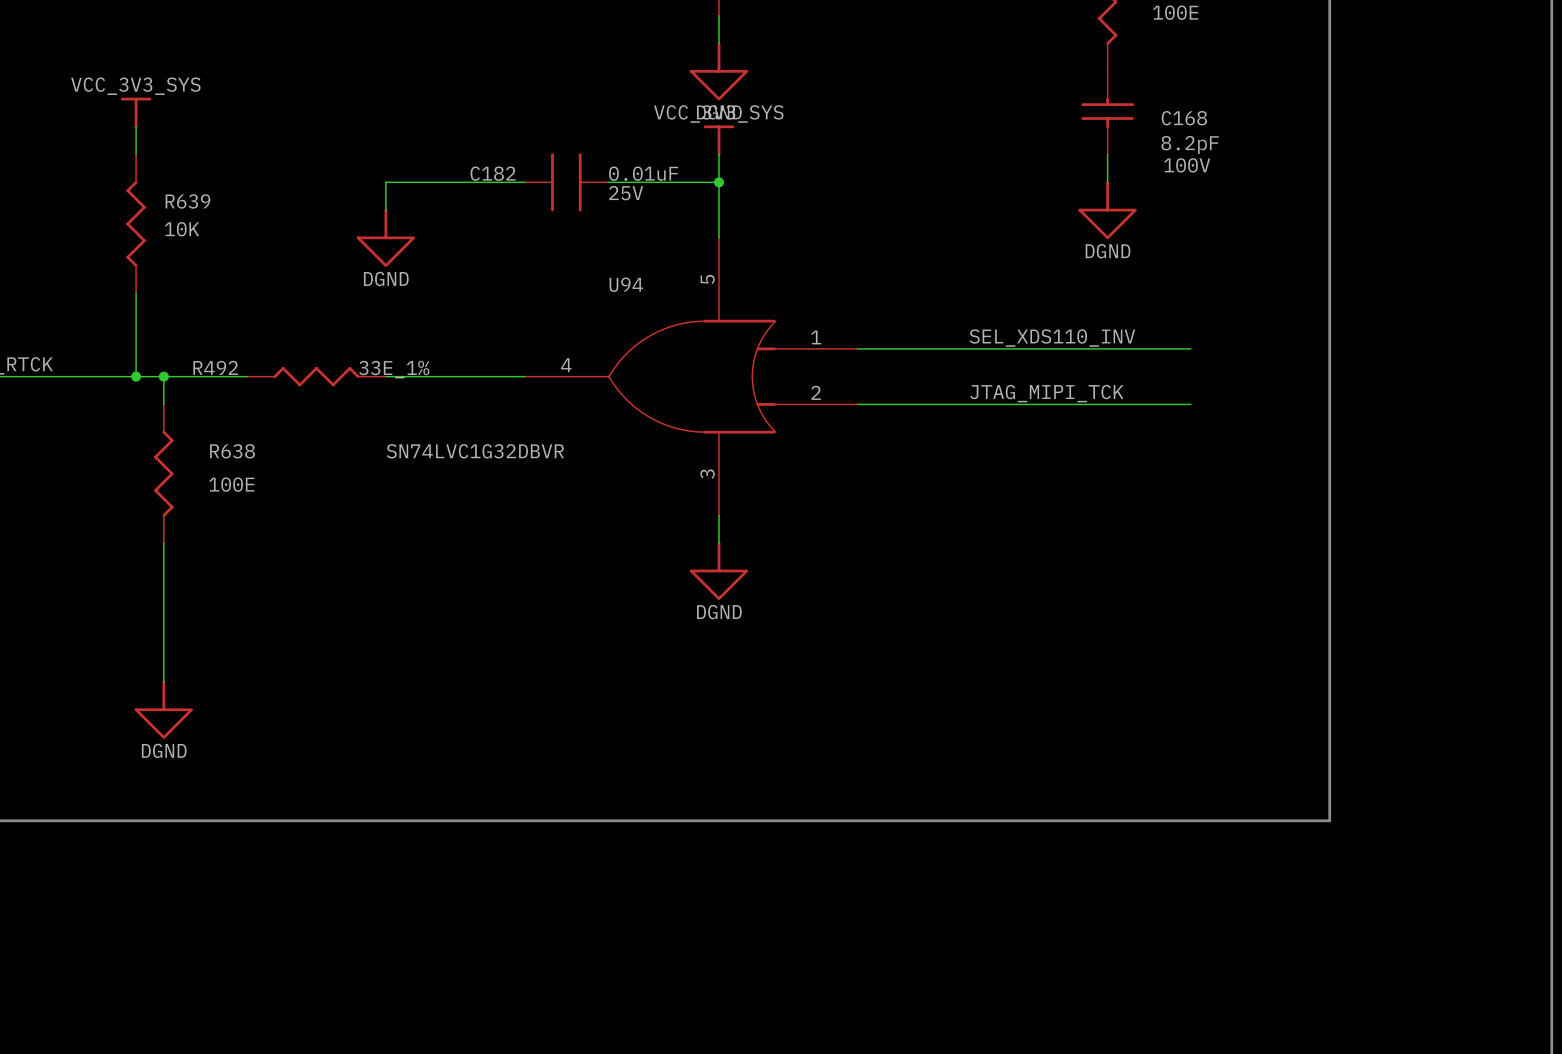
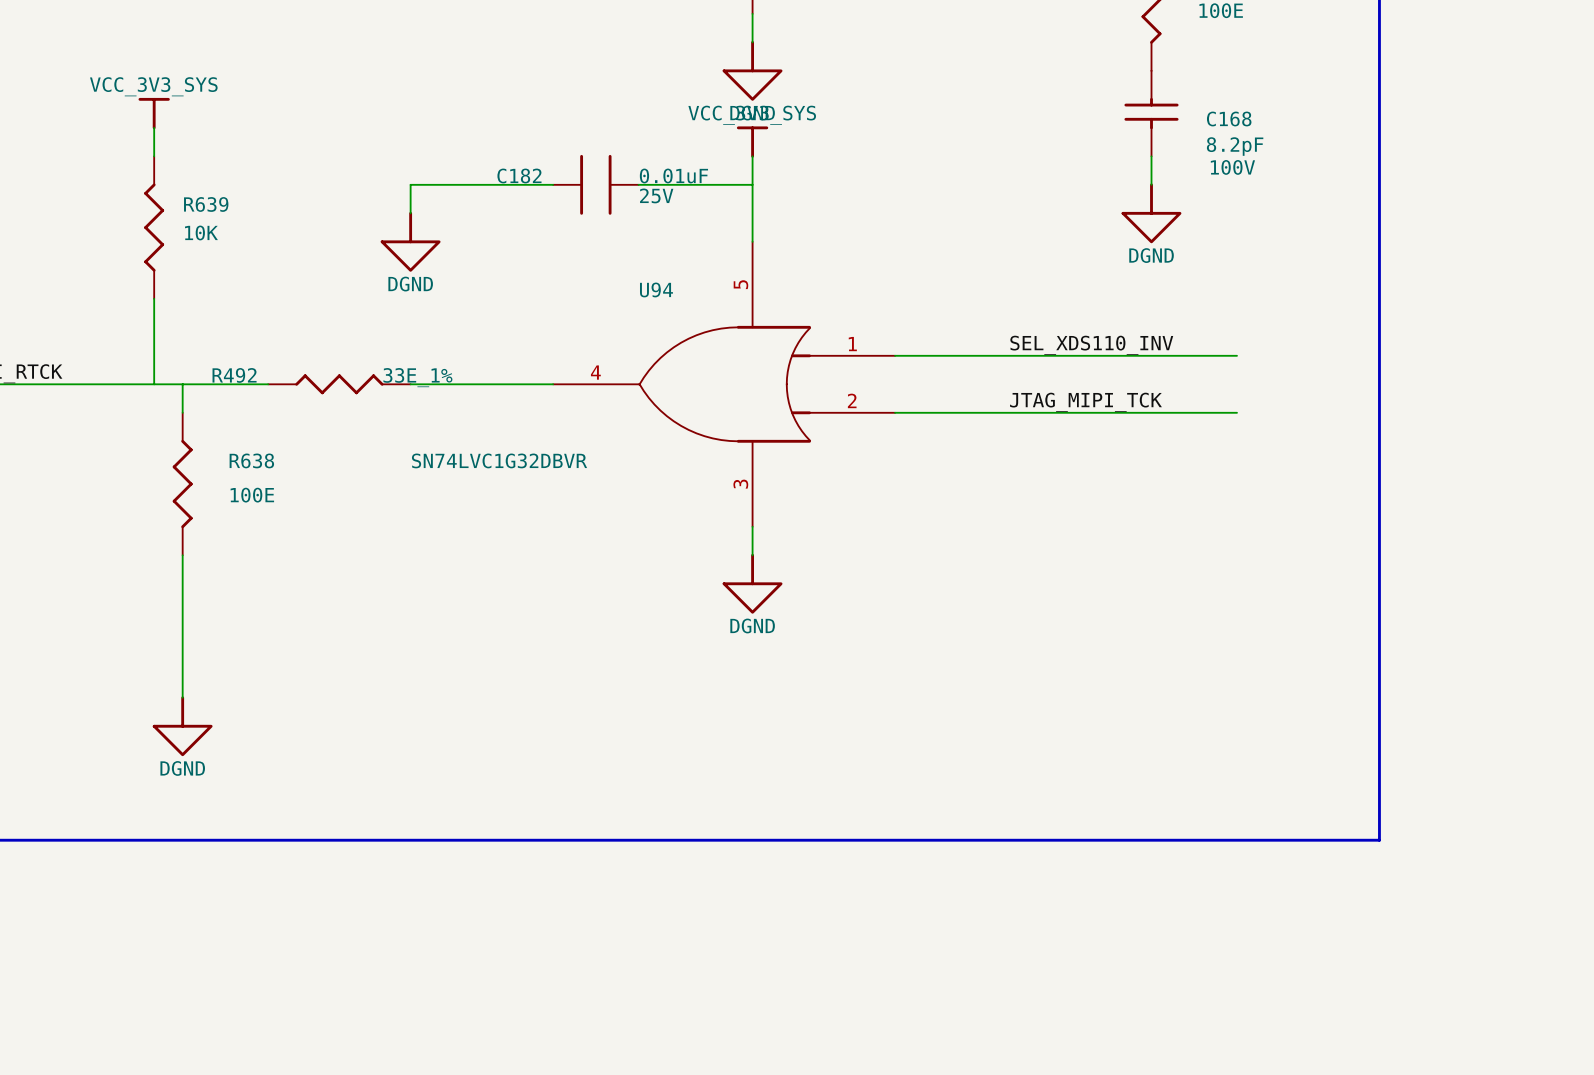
junction: (719, 182) -> none
junction: (136, 376) -> none
junction: (163, 376) -> none

